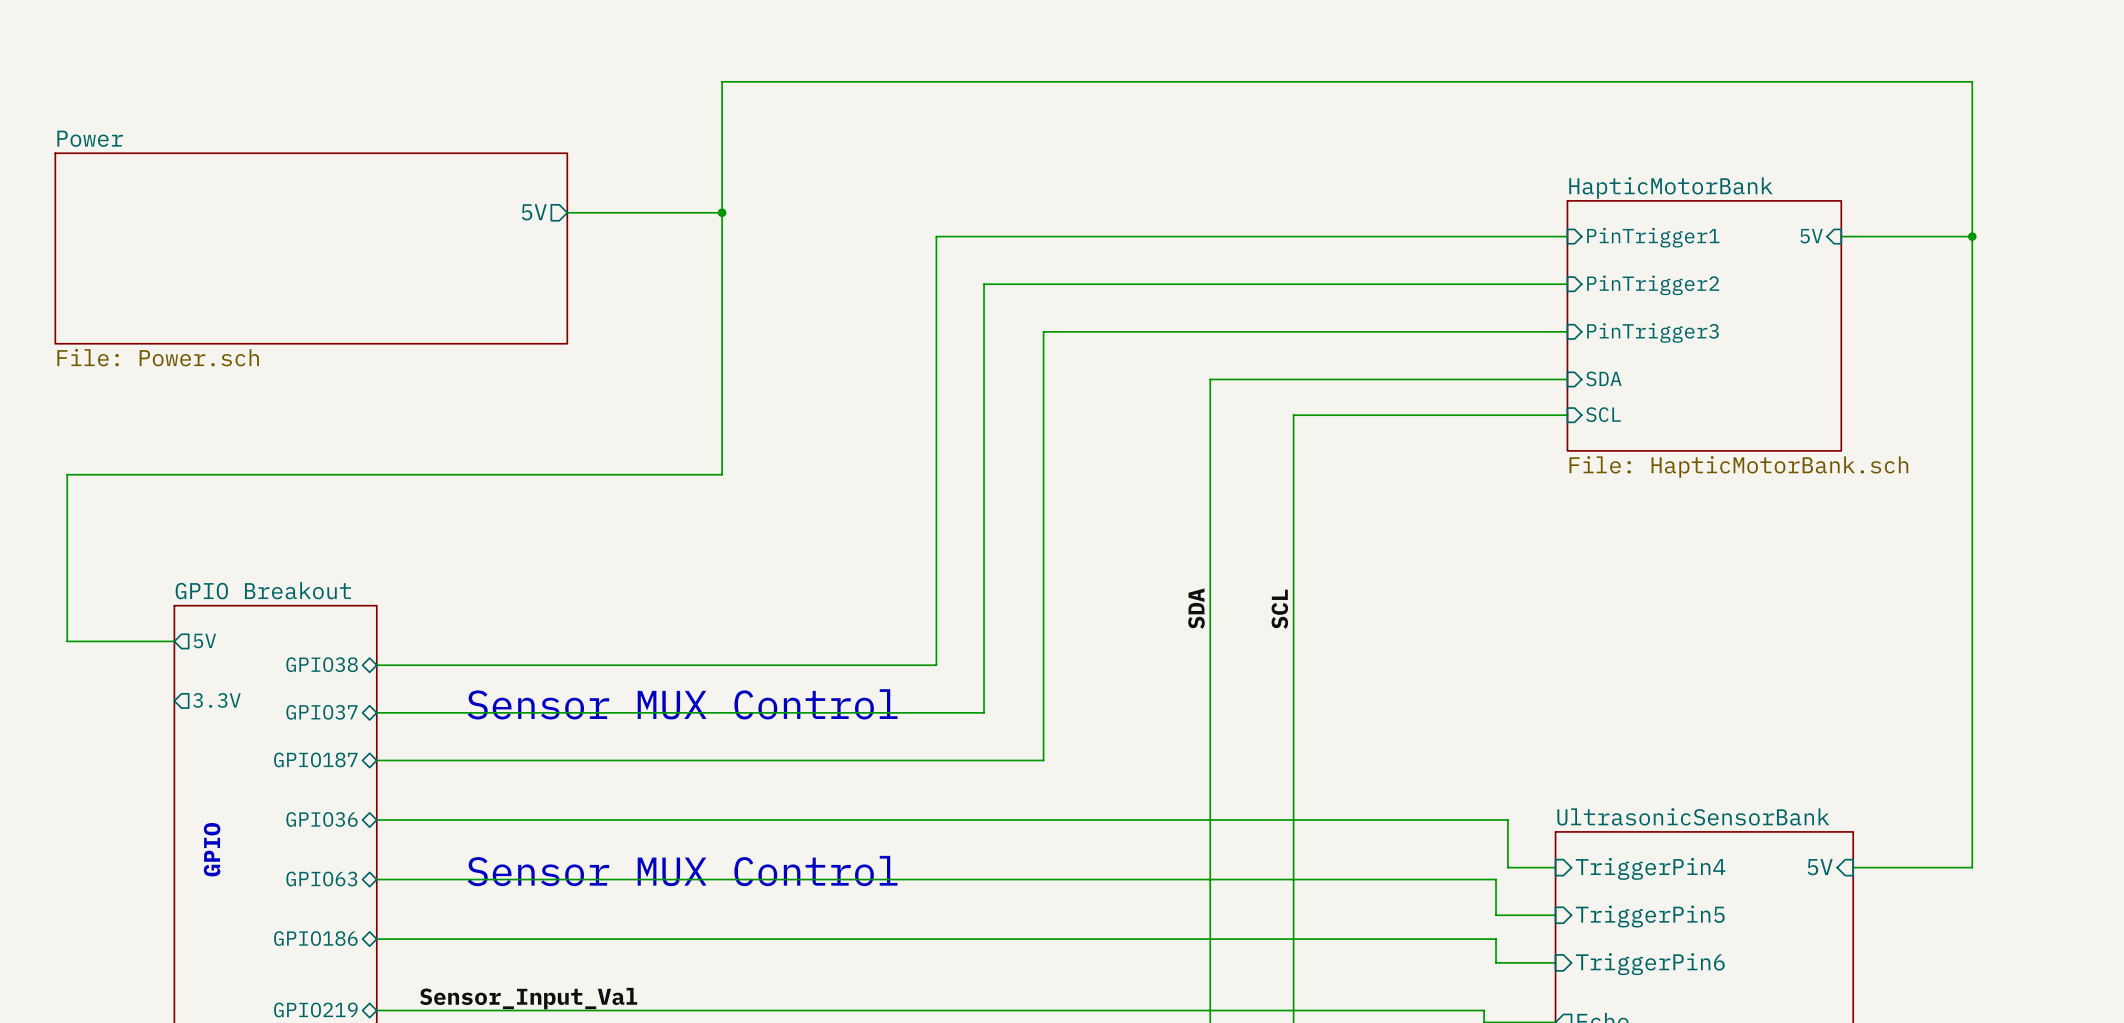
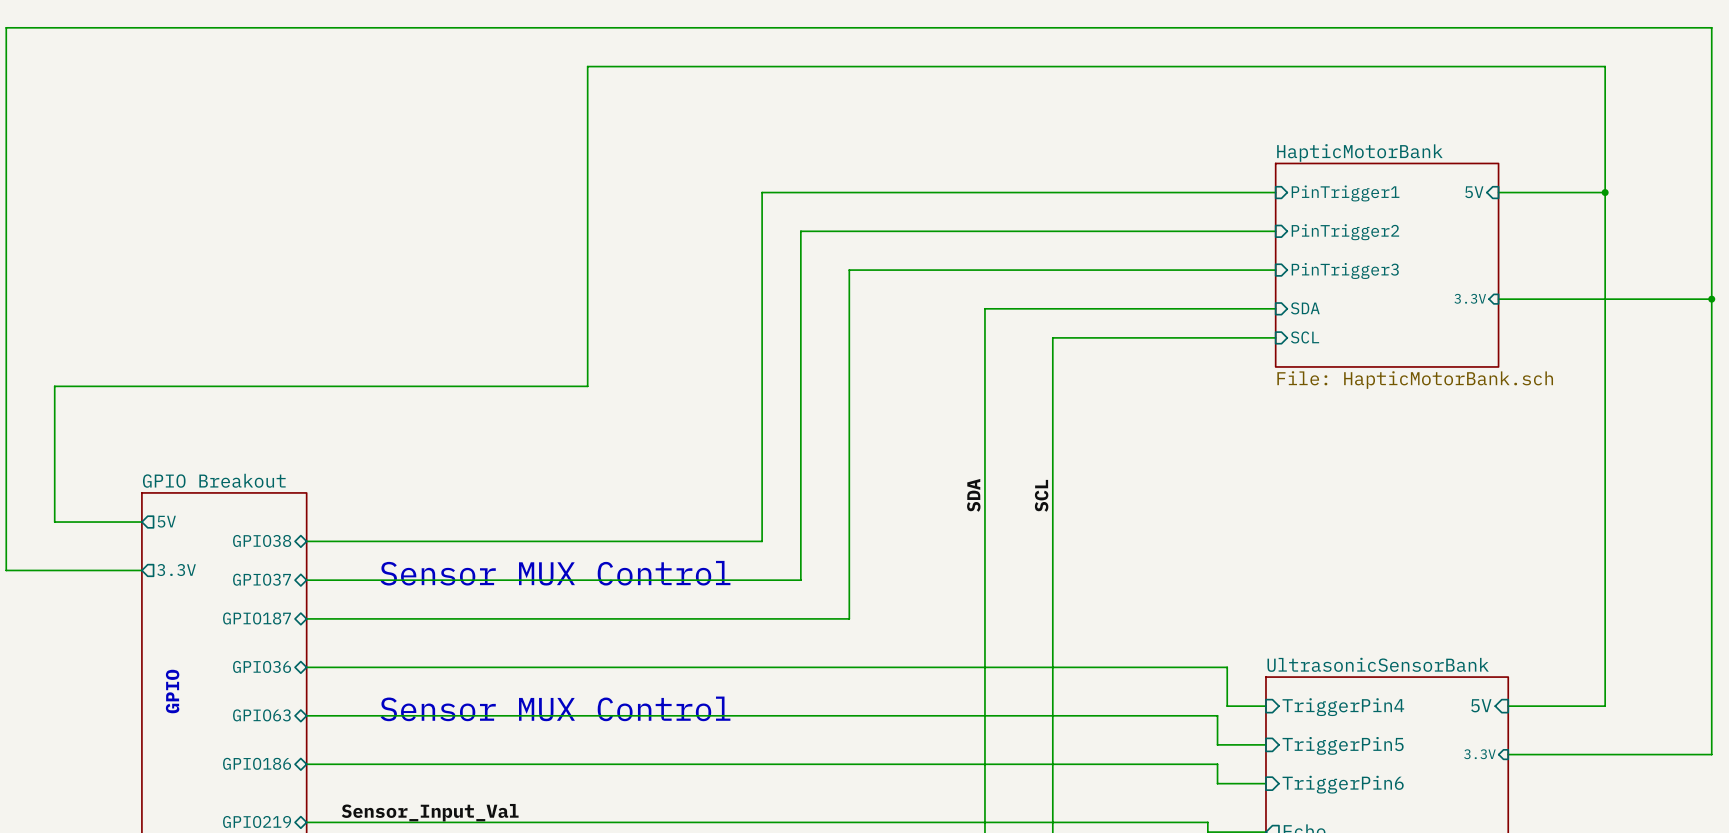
sheet pin: 5V (534, 212) -> none
wire: (567, 212) (722, 212) -> none
junction: (722, 212) -> none
sheet Power: File: Power.sch (311, 248) -> none
sheet pin: none -> 3.3V (1470, 298)
wire: none -> (1498, 299) (1711, 299)
junction: none -> (1711, 299)
wire: none -> (141, 570) (6, 570) (6, 27) (1711, 27) (1711, 754) (1508, 754)
sheet pin: none -> 3.3V (1479, 754)

